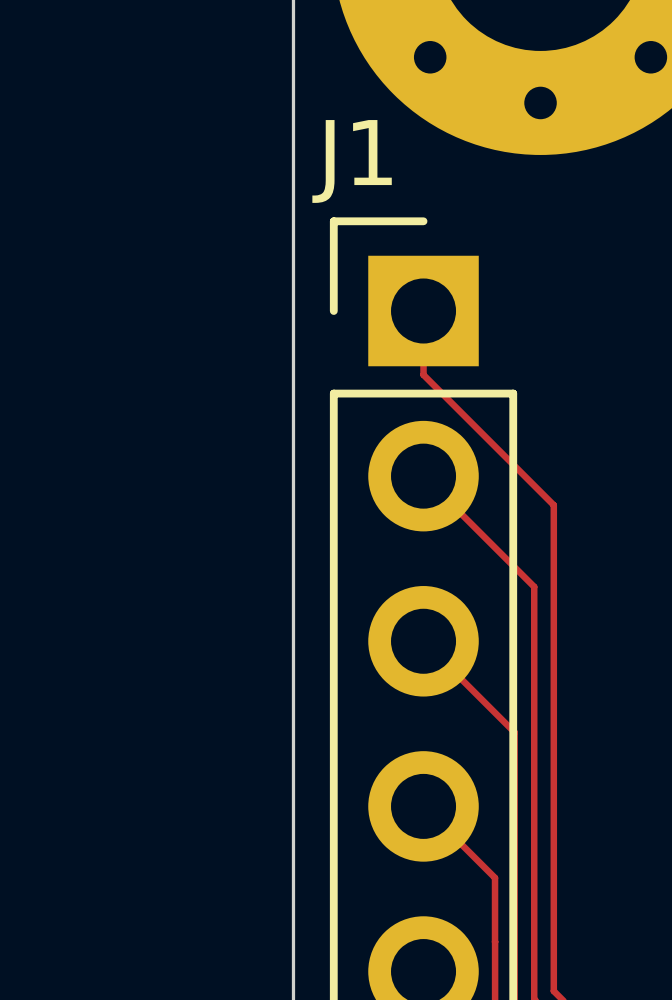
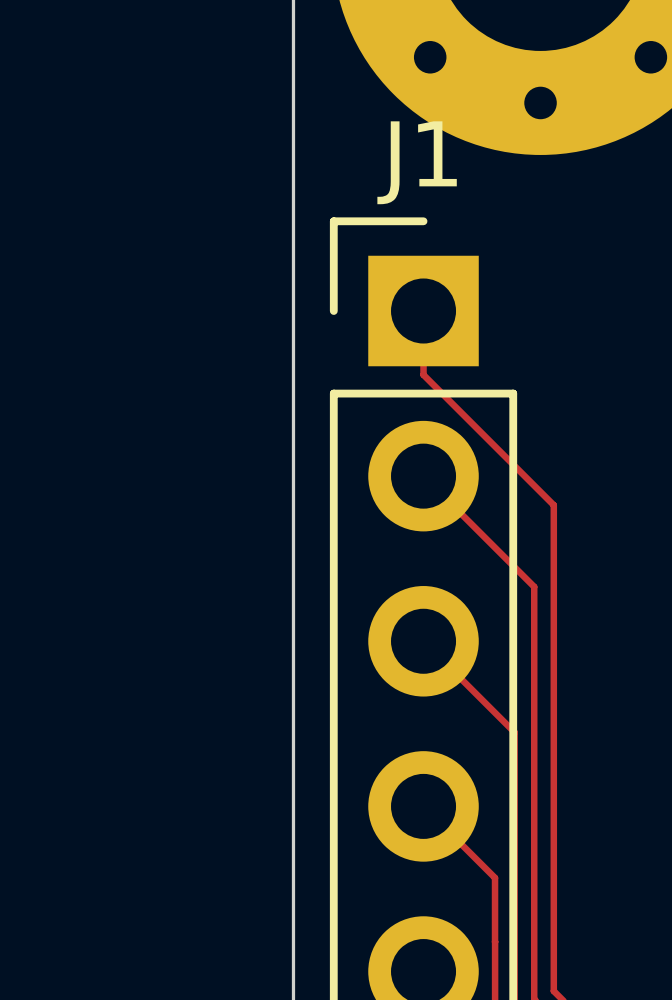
J1 name position: J1 (352, 161) -> J1 (417, 162)

